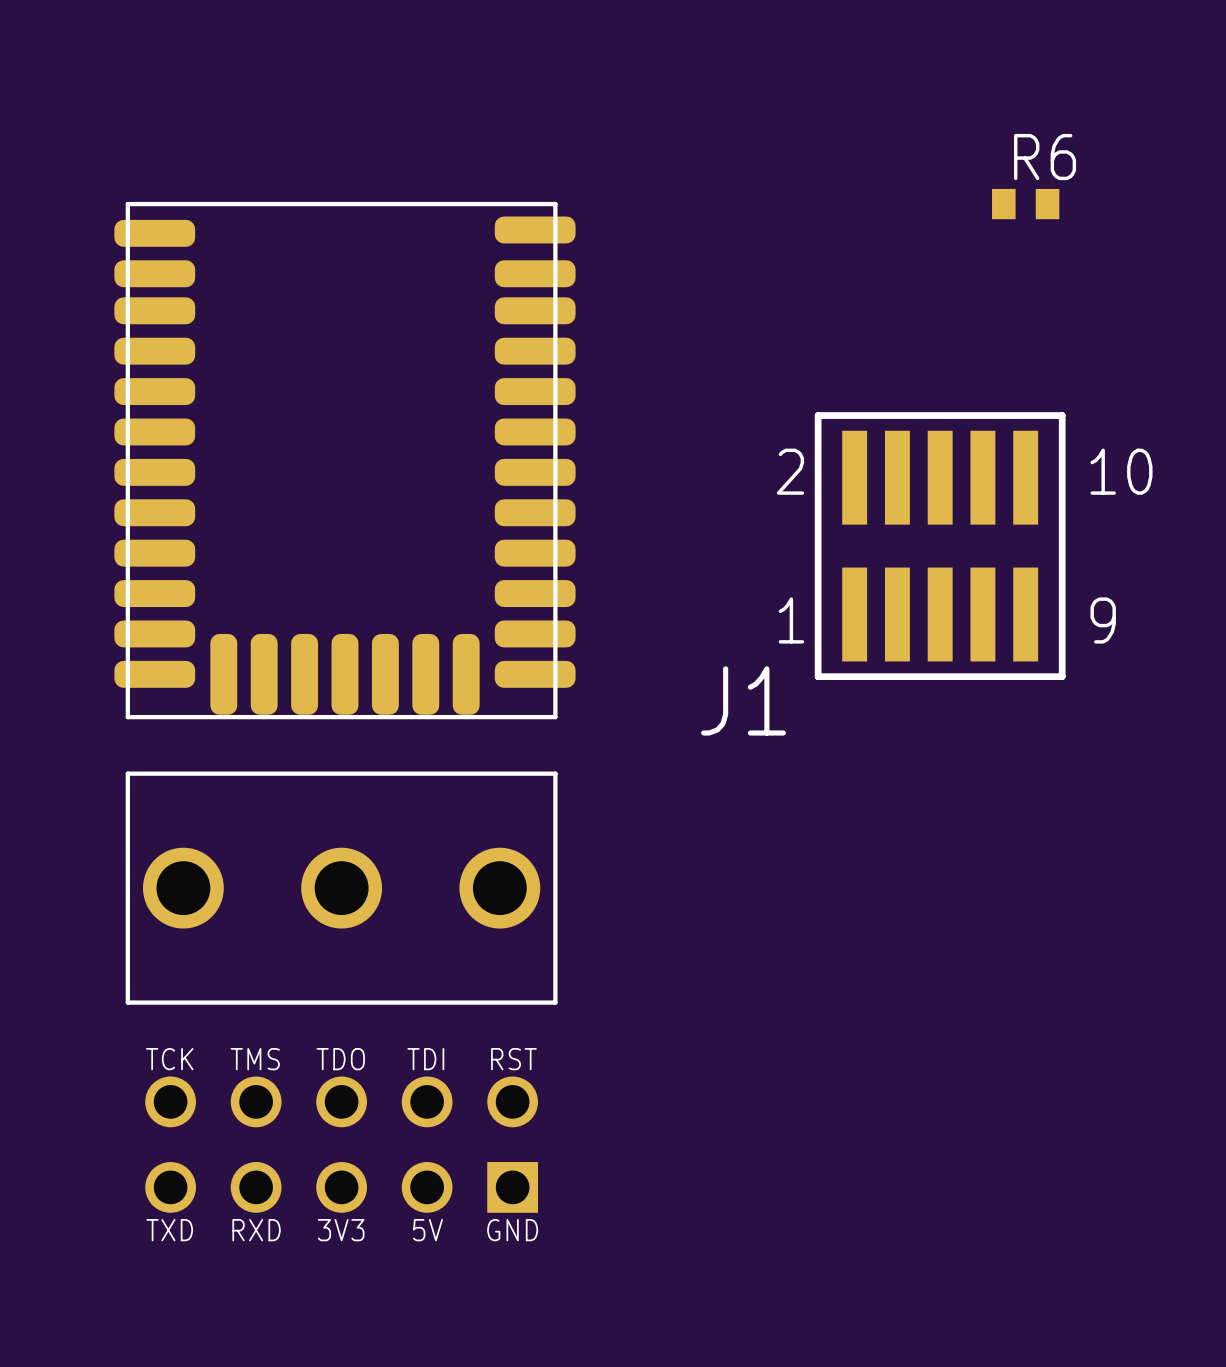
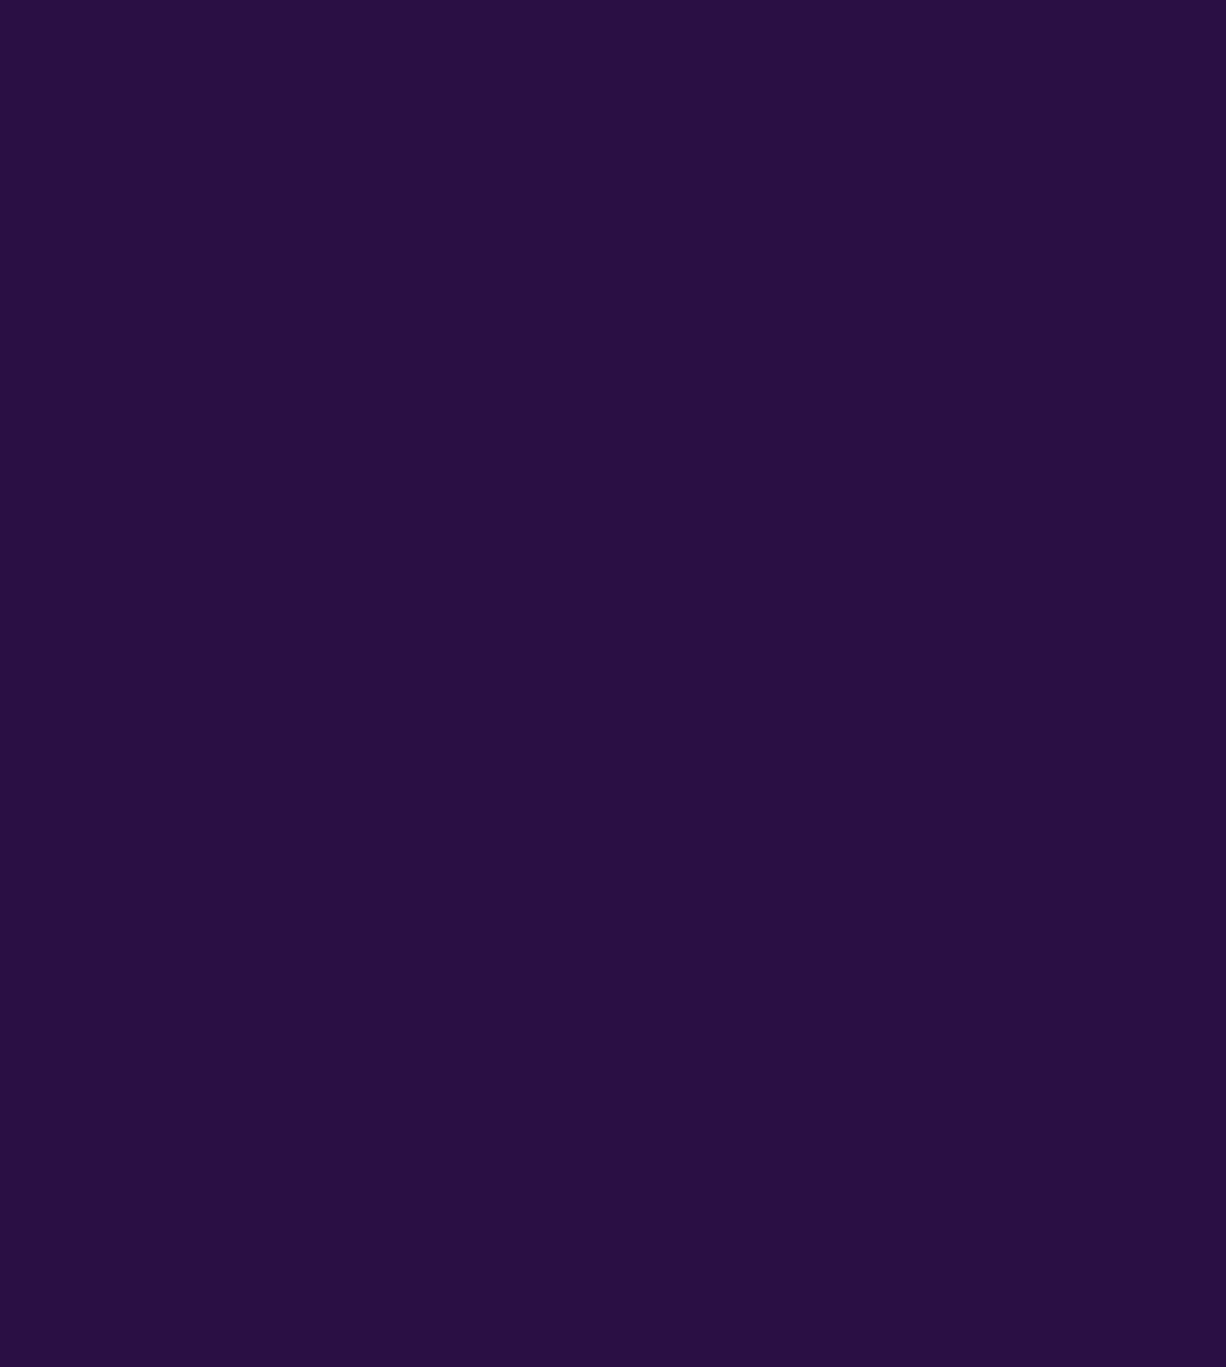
R6: (1025, 204) -> none
part: (344, 460) -> none
J1: (940, 546) -> none
part: (341, 888) -> none
part: (341, 1144) -> none

